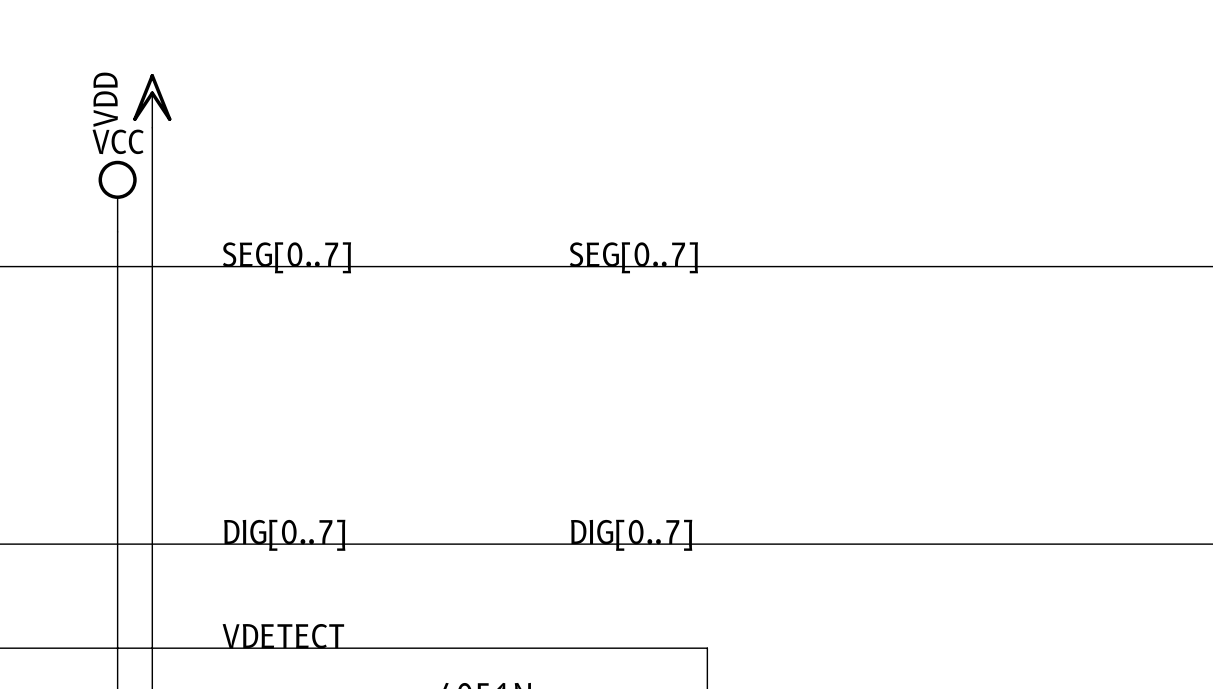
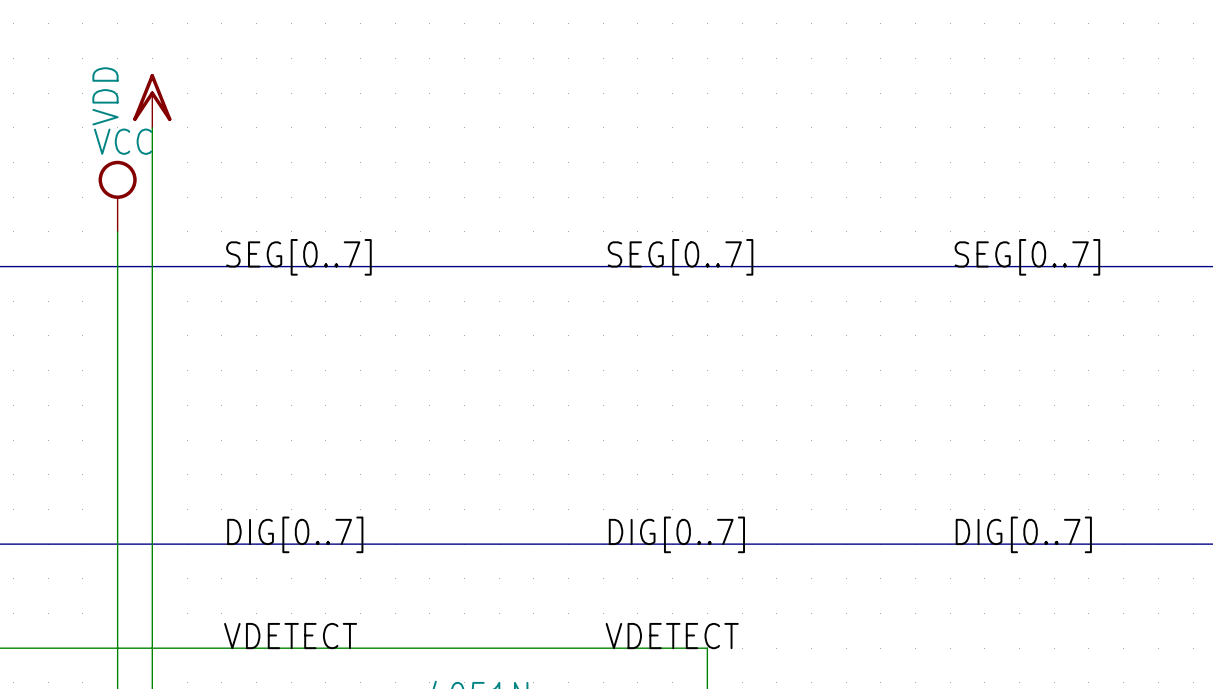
label position: SEG[0..7] (633, 257) -> SEG[0..7] (680, 257)
label: none -> SEG[0..7] (1027, 257)
label position: DIG[0..7] (631, 535) -> DIG[0..7] (676, 534)
label: none -> DIG[0..7] (1023, 534)
label: none -> VDETECT (672, 636)

